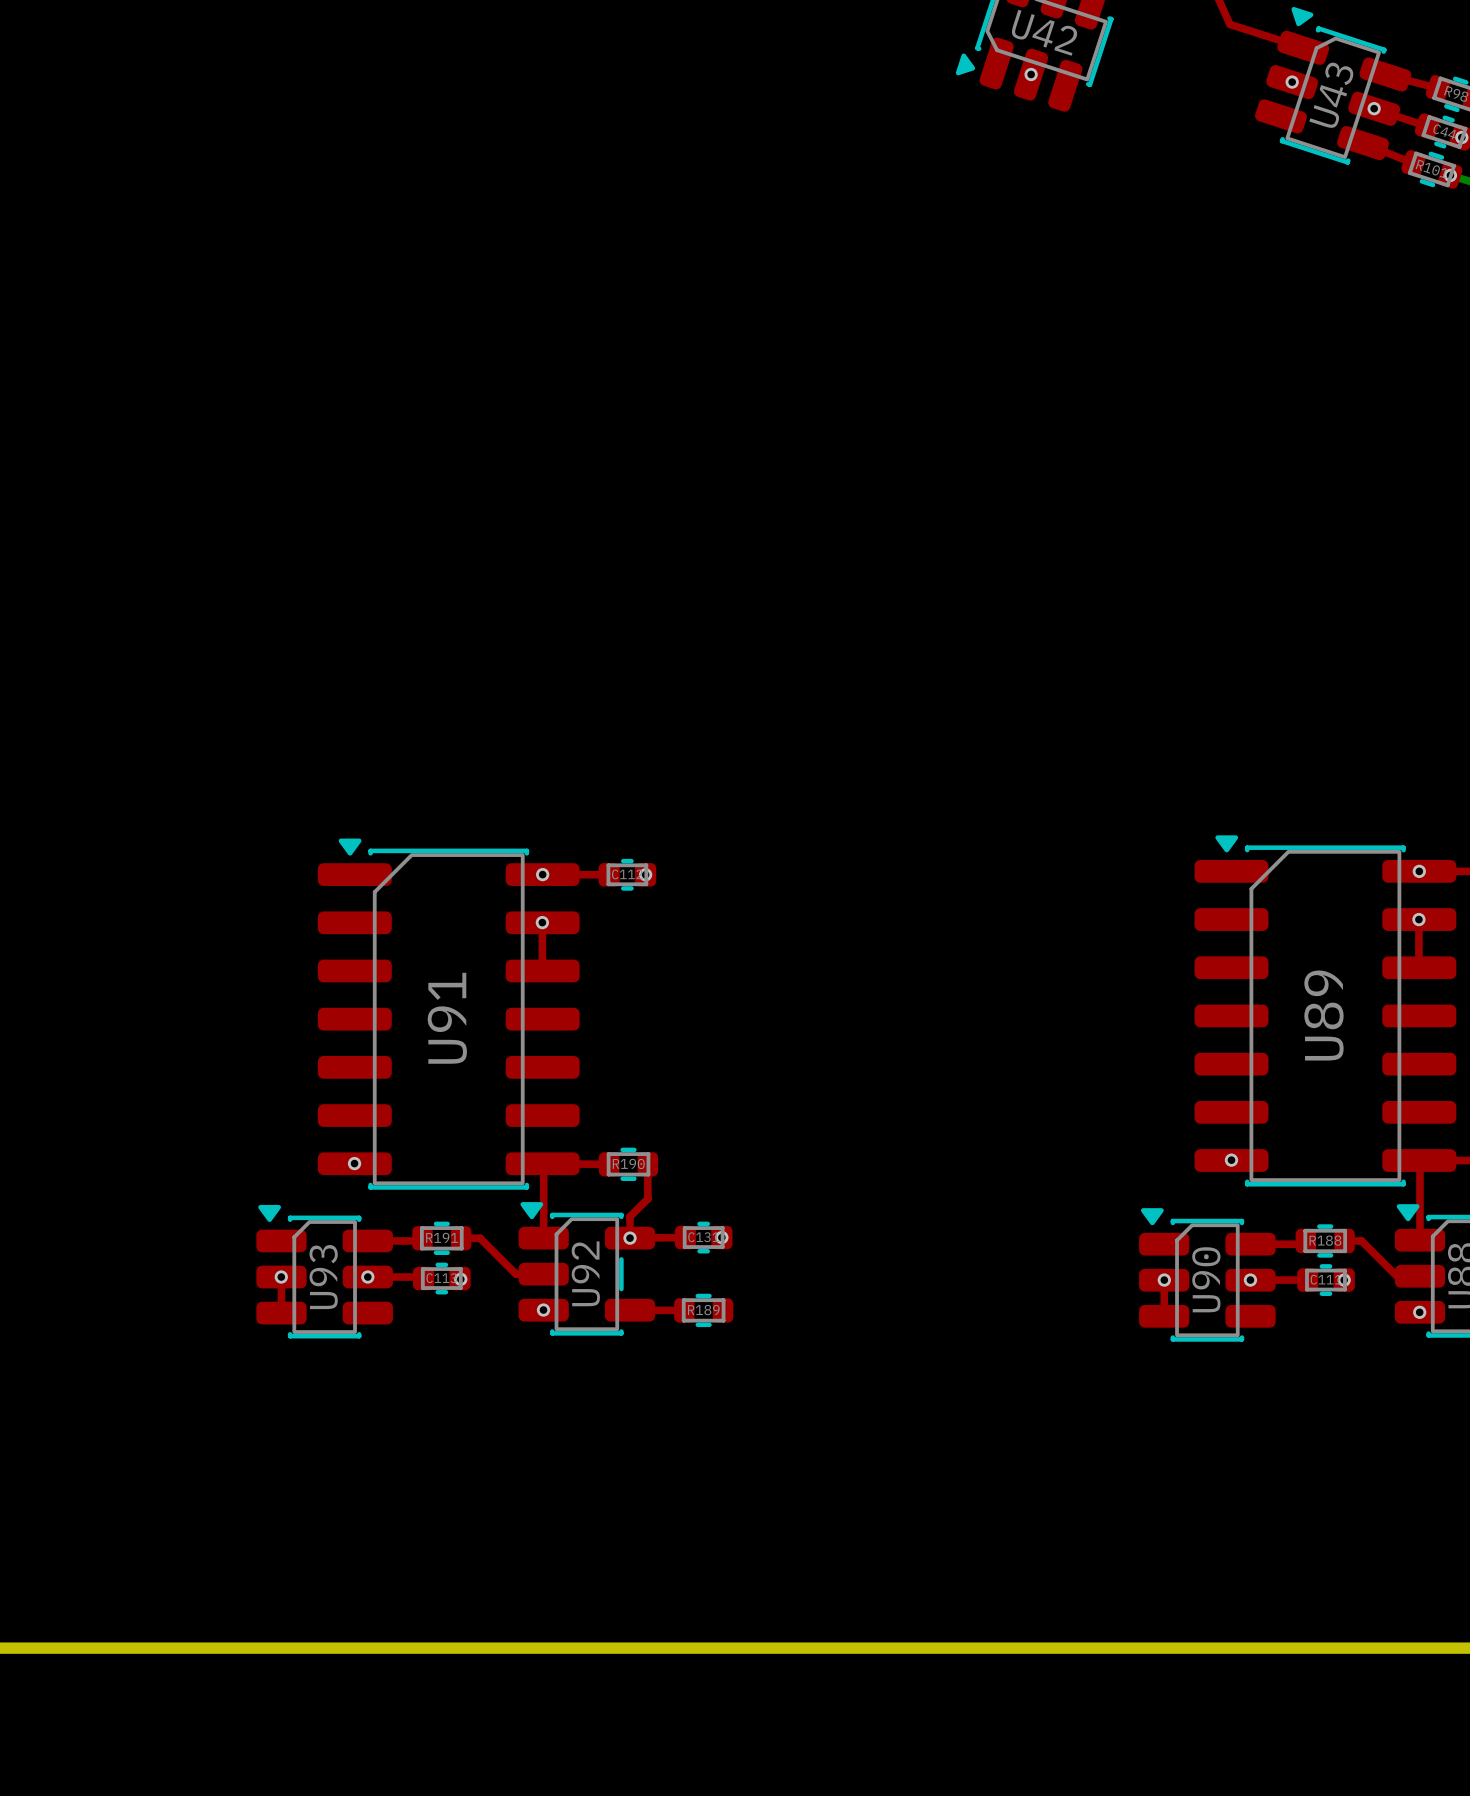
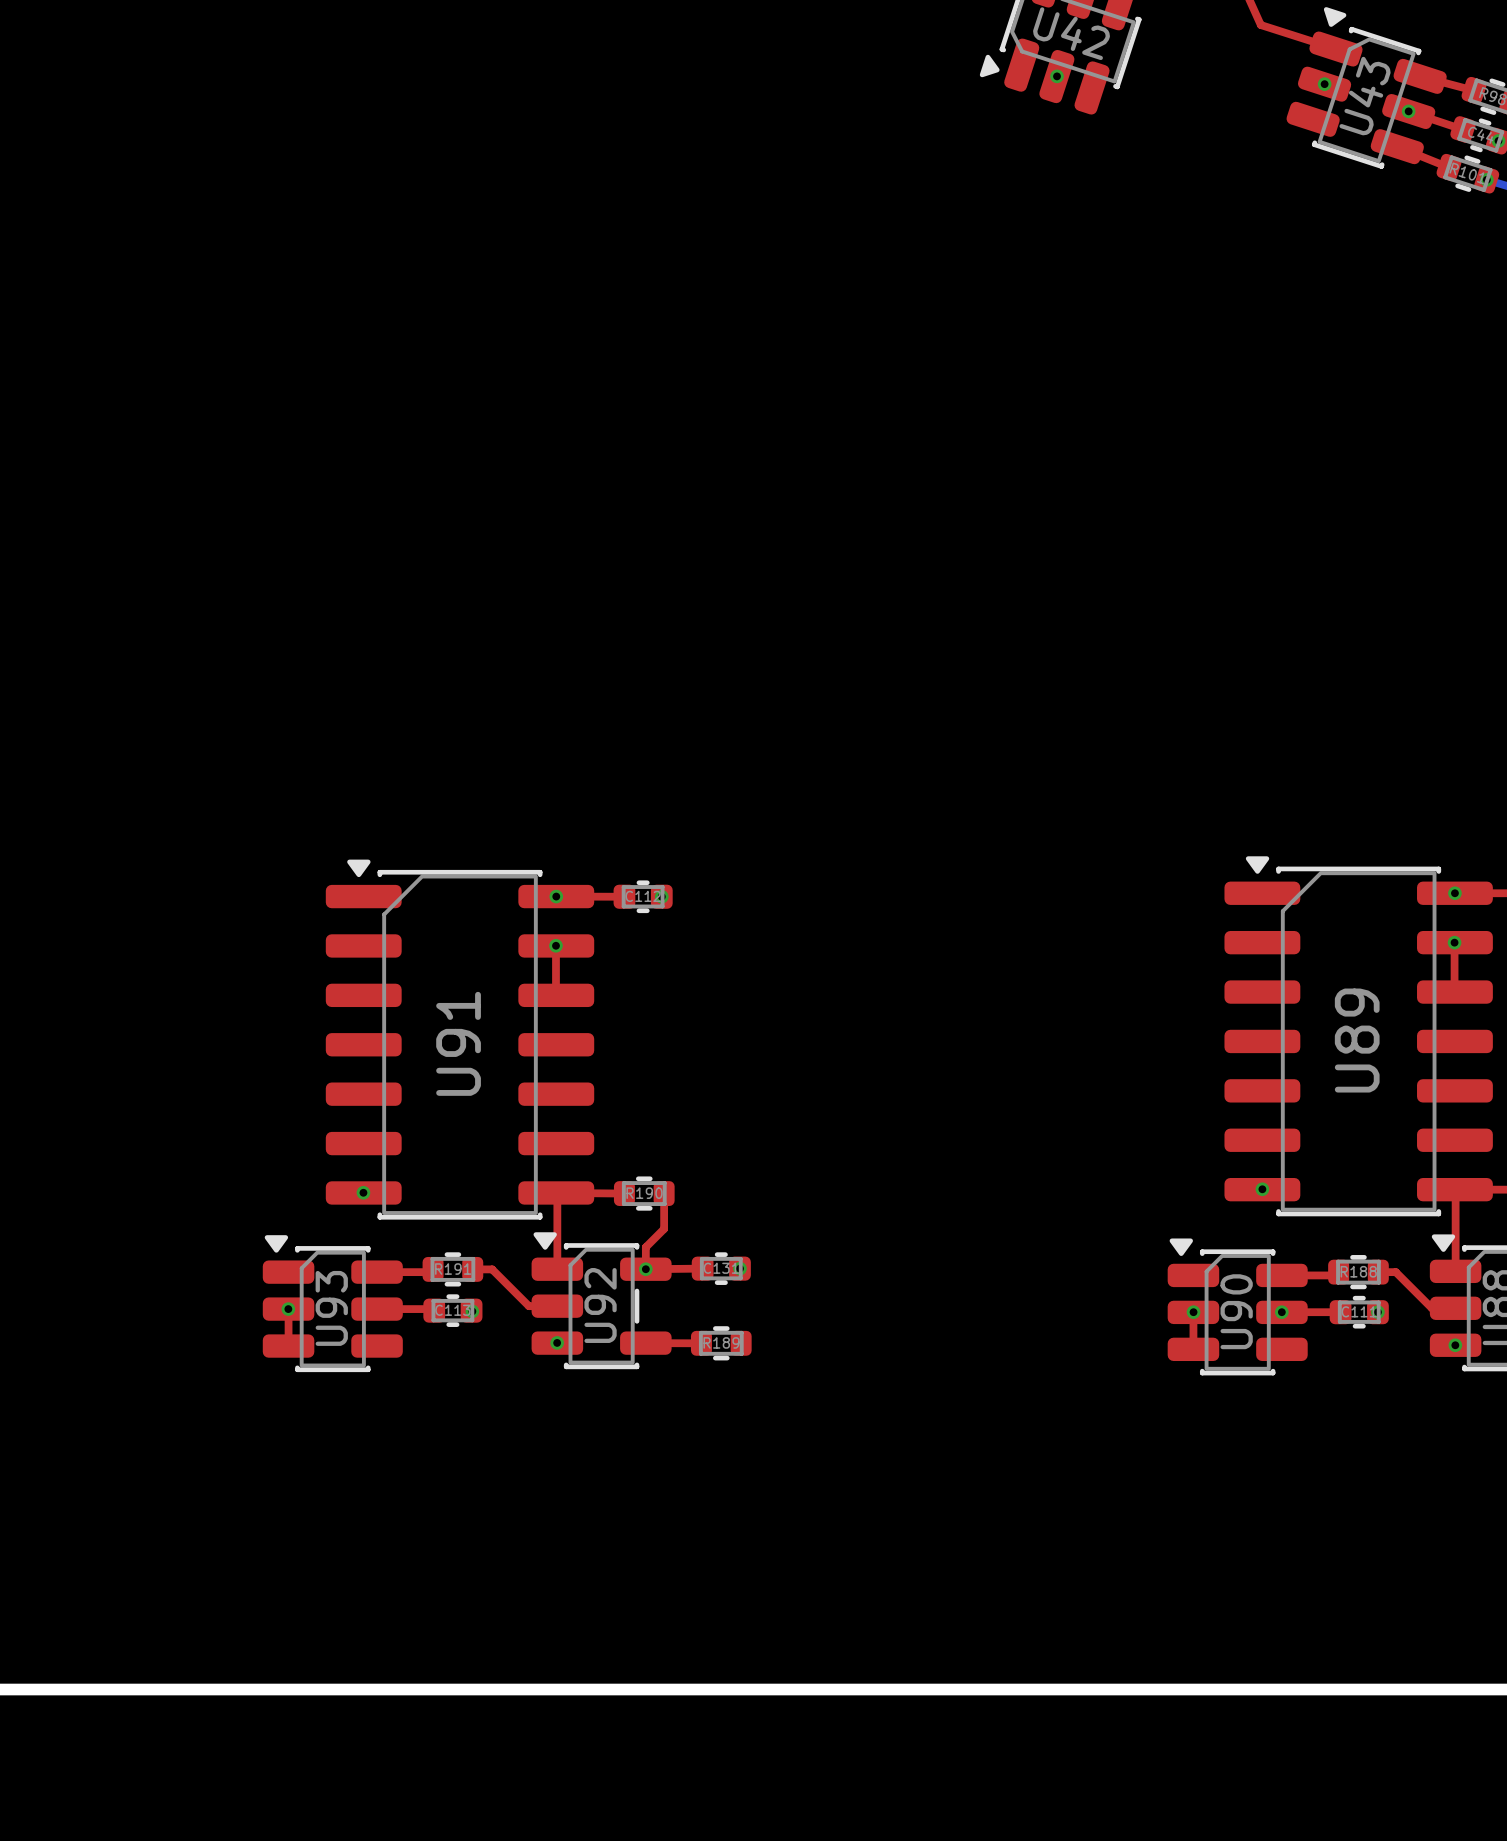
via: (367, 1277) -> none

